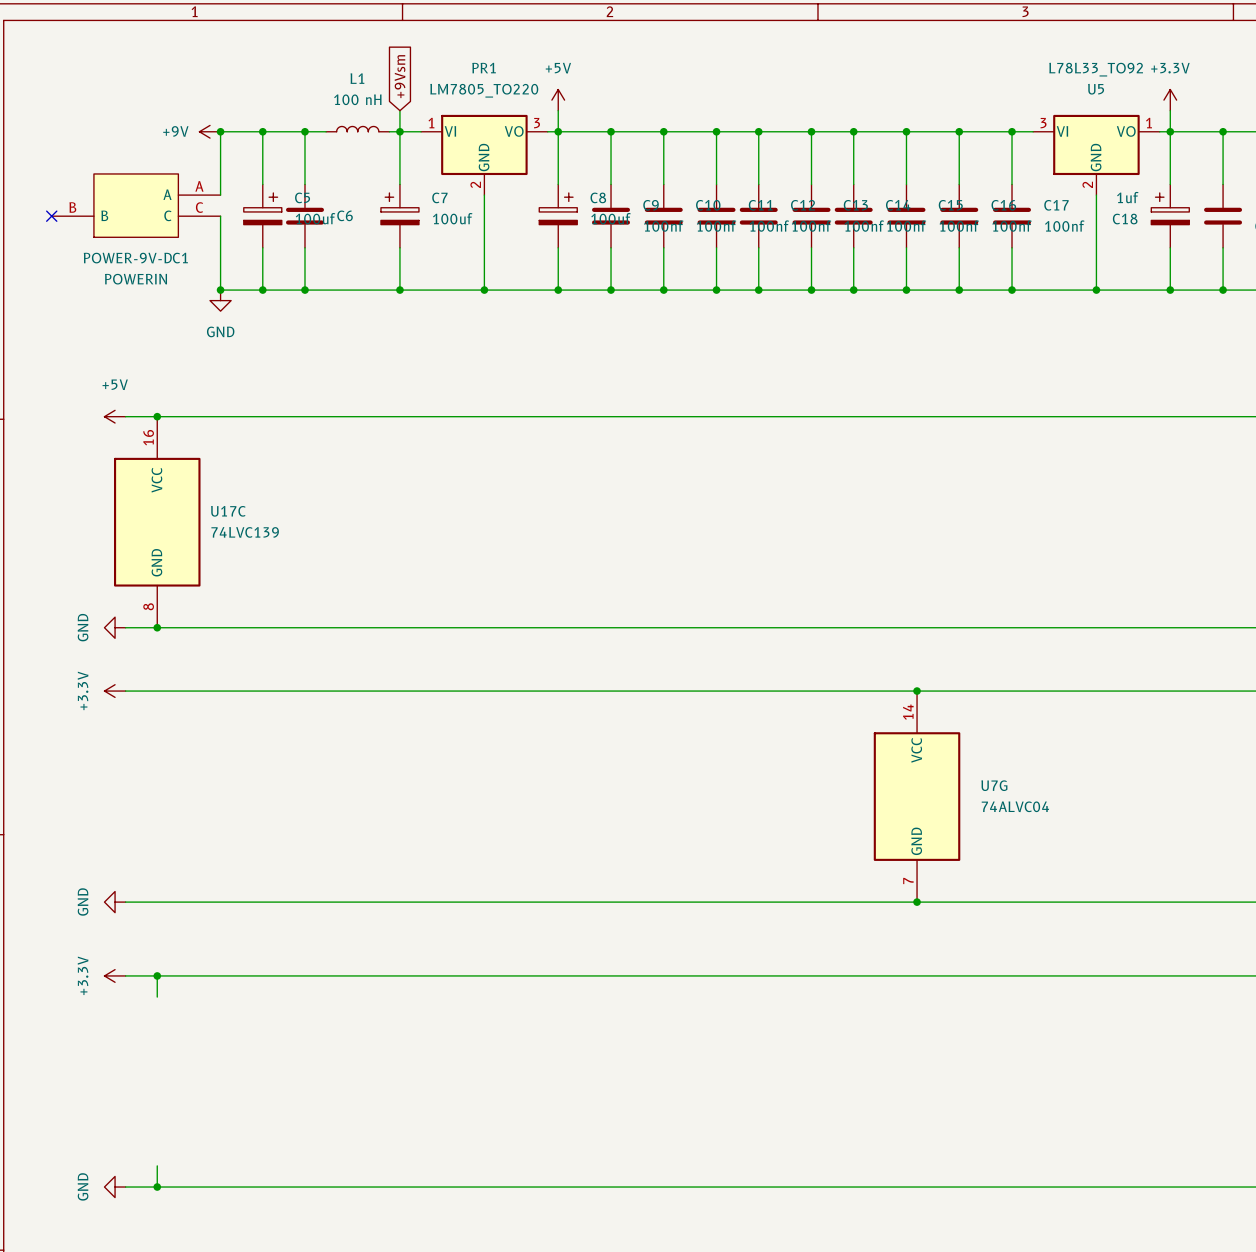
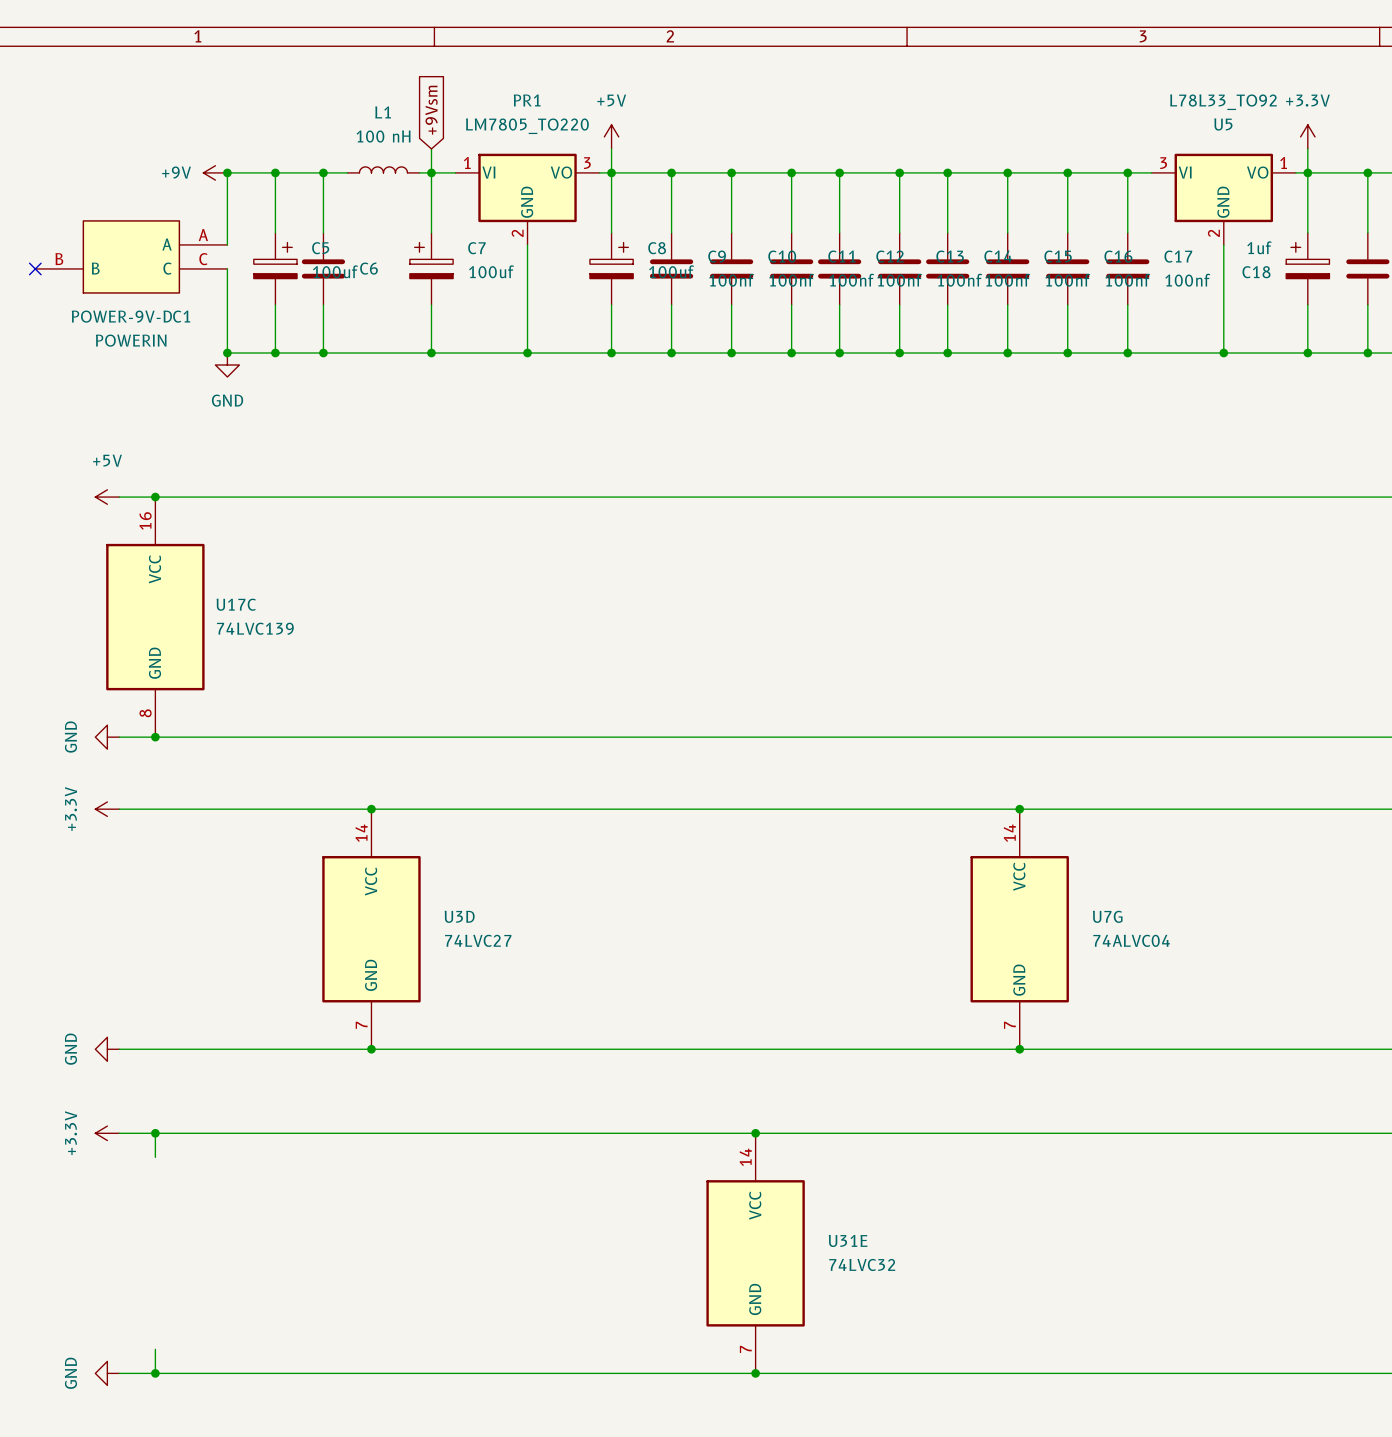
junction: none -> (371, 809)
U3D: none -> 74LVC27 (371, 929)
junction: none -> (371, 1049)
junction: none -> (755, 1133)
U31E: none -> 74LVC32 (755, 1253)
junction: none -> (755, 1373)

